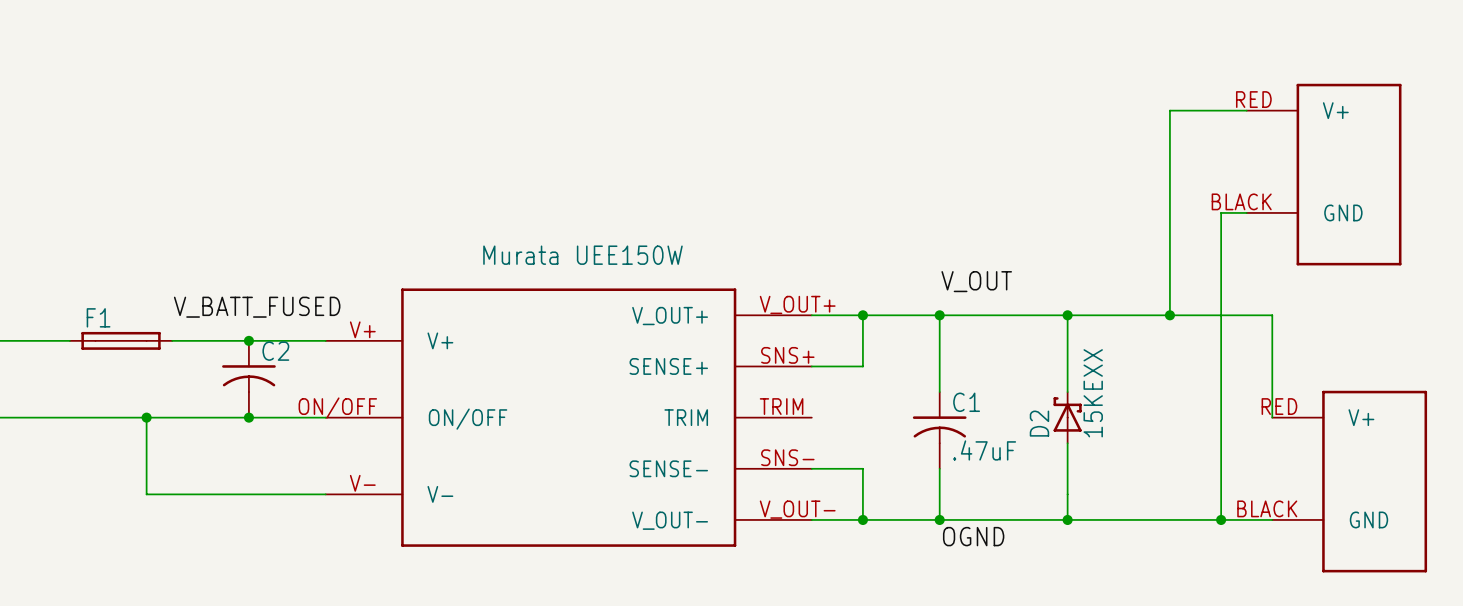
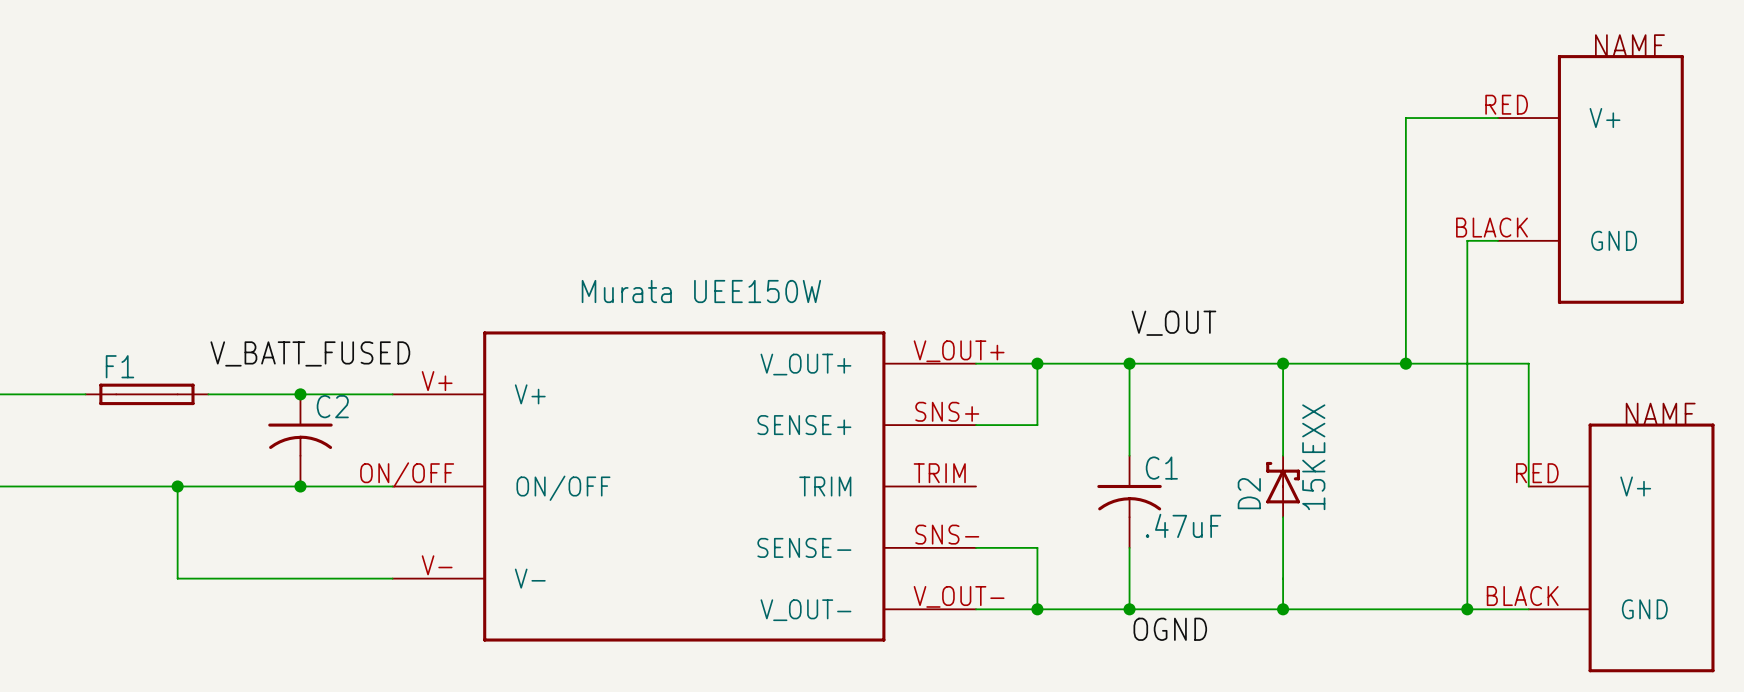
part: none -> (1590, 179)
part: (1324, 174) -> none
part: none -> (1621, 547)
part: (1349, 481) -> none

